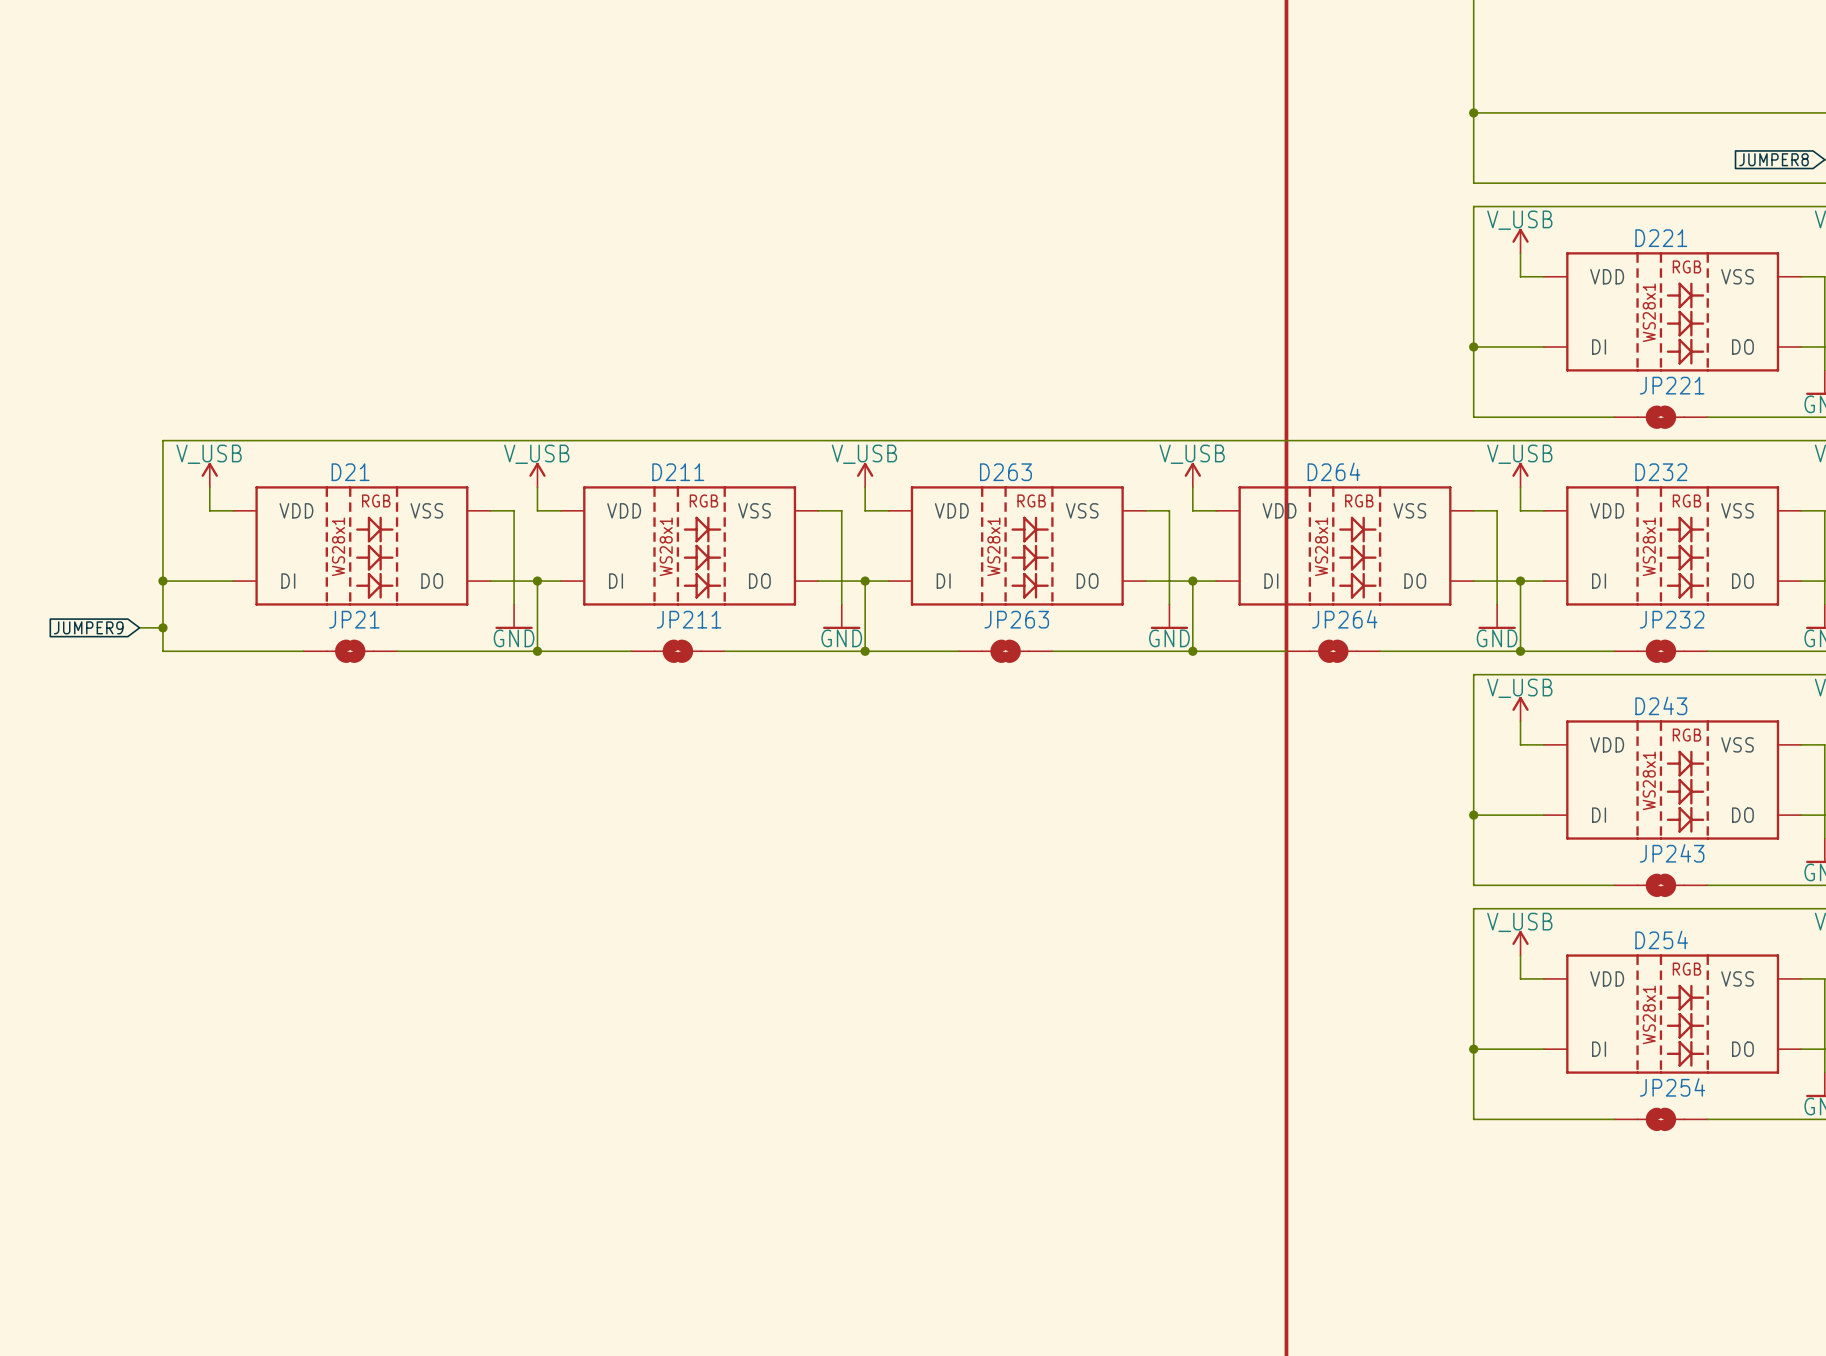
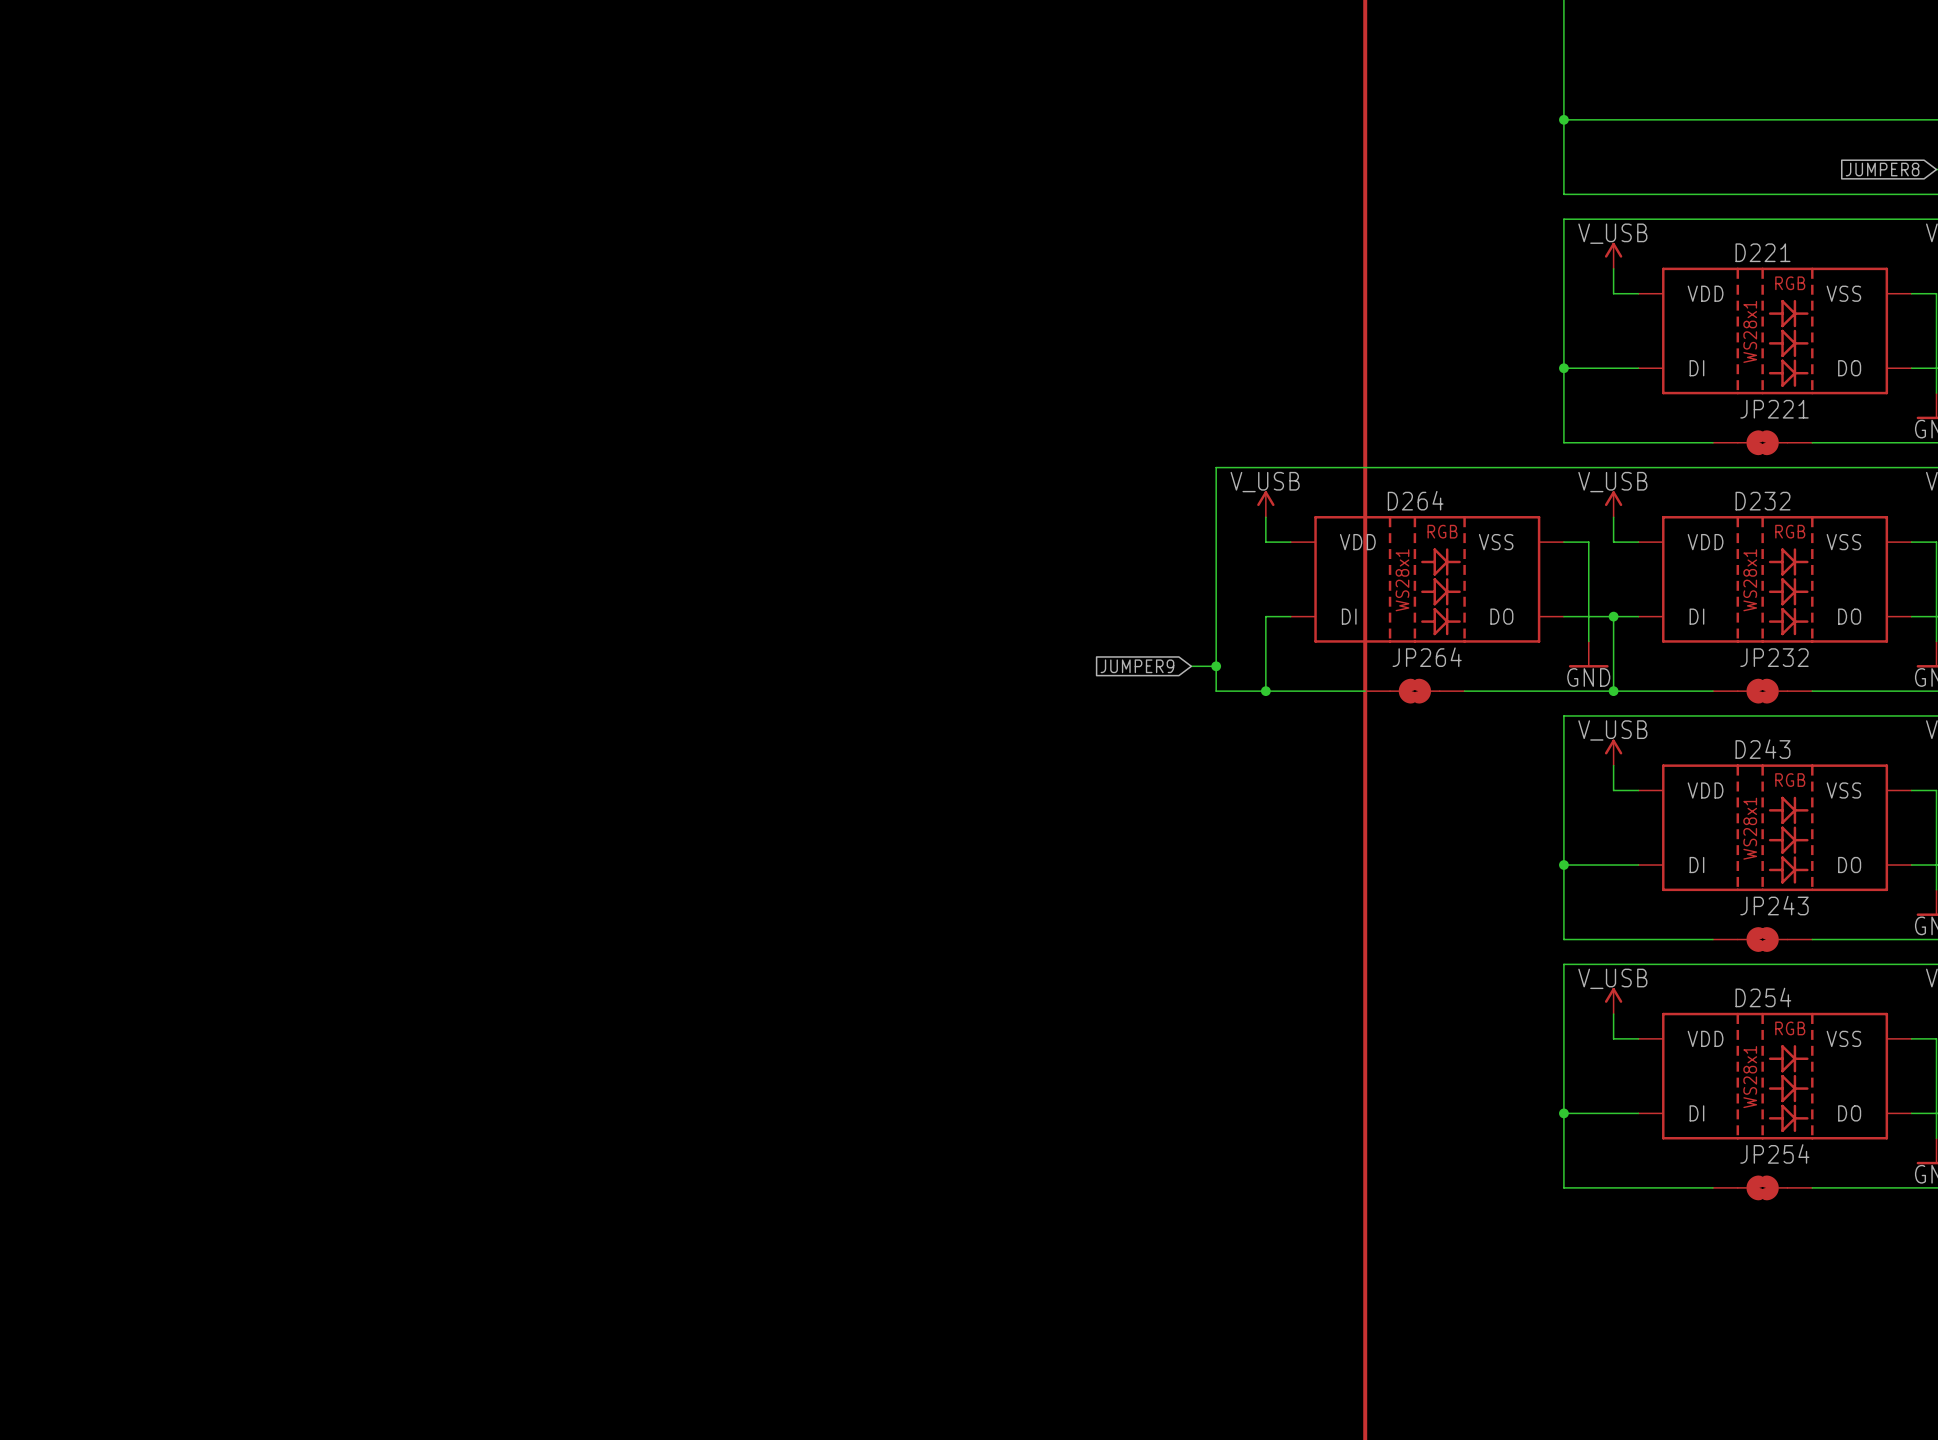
wire: (1146, 440) (162, 440) (162, 651) (303, 651) -> none
power symbol: V_USB (209, 475) -> none
power symbol: V_USB (537, 475) -> none
power symbol: V_USB (865, 475) -> none
wire: (209, 487) (209, 510) (233, 510) -> none
wire: (537, 487) (537, 510) (560, 510) -> none
wire: (865, 487) (865, 510) (888, 510) -> none
wire: (490, 510) (514, 510) (514, 604) -> none
wire: (818, 510) (841, 510) (841, 604) -> none
wire: (1146, 510) (1169, 510) (1169, 604) -> none
D21: (361, 545) -> none
D211: (689, 545) -> none
D263: (1017, 545) -> none
wire: (162, 581) (233, 581) -> none
junction: (162, 581) -> none
wire: (490, 581) (560, 581) -> none
wire: (537, 581) (537, 651) -> none
junction: (537, 581) -> none
wire: (818, 581) (888, 581) -> none
wire: (865, 581) (865, 651) -> none
junction: (865, 581) -> none
wire: (1146, 581) (1192, 581) -> none
junction: (1192, 581) -> none
power symbol: GND (514, 616) -> none
power symbol: GND (841, 616) -> none
power symbol: GND (1169, 616) -> none
global label: JUMPER9 (88, 627) -> none
wire: (139, 627) (162, 627) -> none
junction: (162, 627) -> none
global label: none -> JUMPER9 (1137, 666)
wire: none -> (1191, 666) (1216, 666)
junction: none -> (1216, 666)
JP21: (350, 651) -> none
wire: (397, 651) (631, 651) -> none
junction: (537, 651) -> none
JP211: (677, 651) -> none
wire: (724, 651) (958, 651) -> none
junction: (865, 651) -> none
JP263: (1005, 651) -> none
wire: (1052, 651) (1146, 651) -> (1216, 467) (1216, 691)

